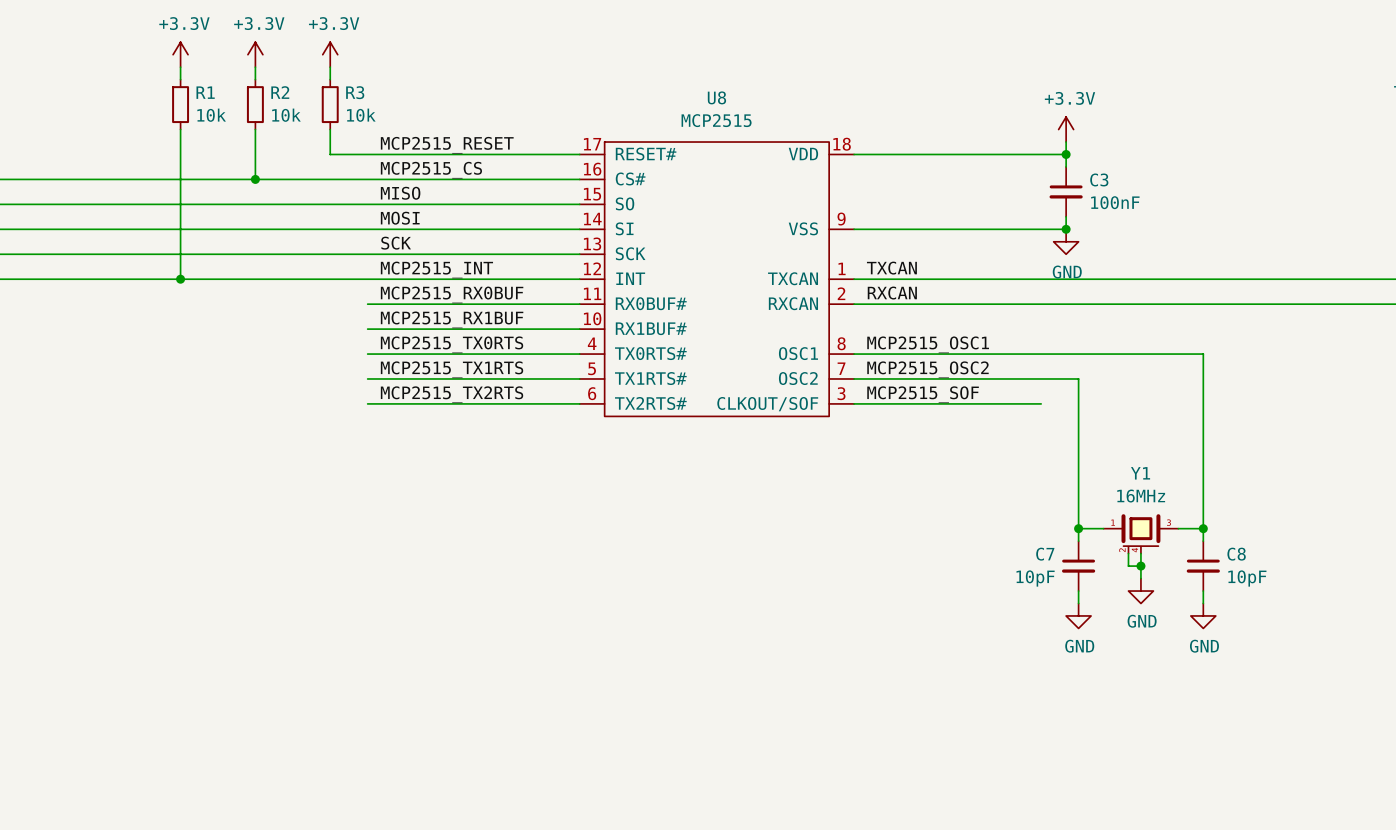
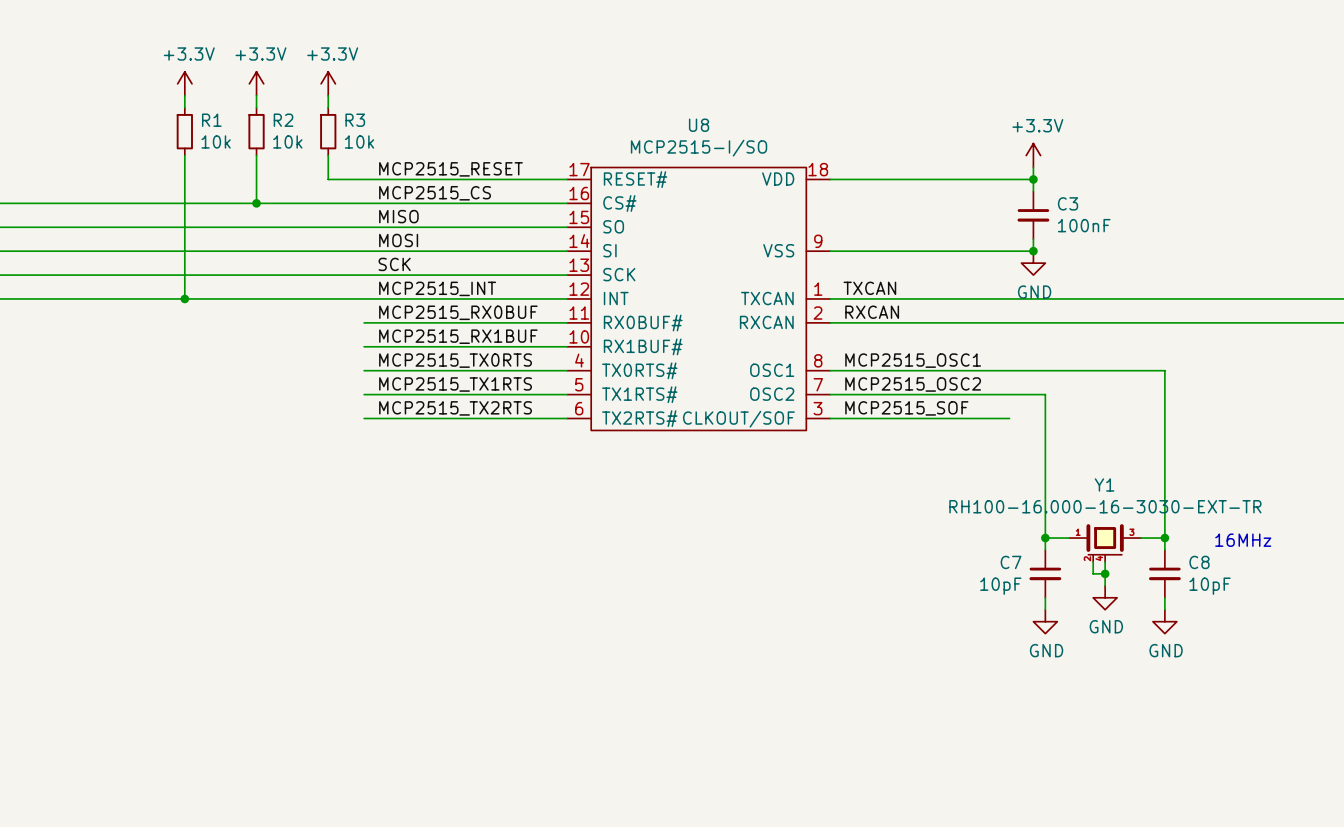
U8 value: MCP2515 (716, 120) -> MCP2515-I/SO (699, 148)
Y1 value: 16MHz (1141, 496) -> RH100-16.000-16-3030-EXT-TR (1105, 506)
text: none -> 16MHz (1243, 540)

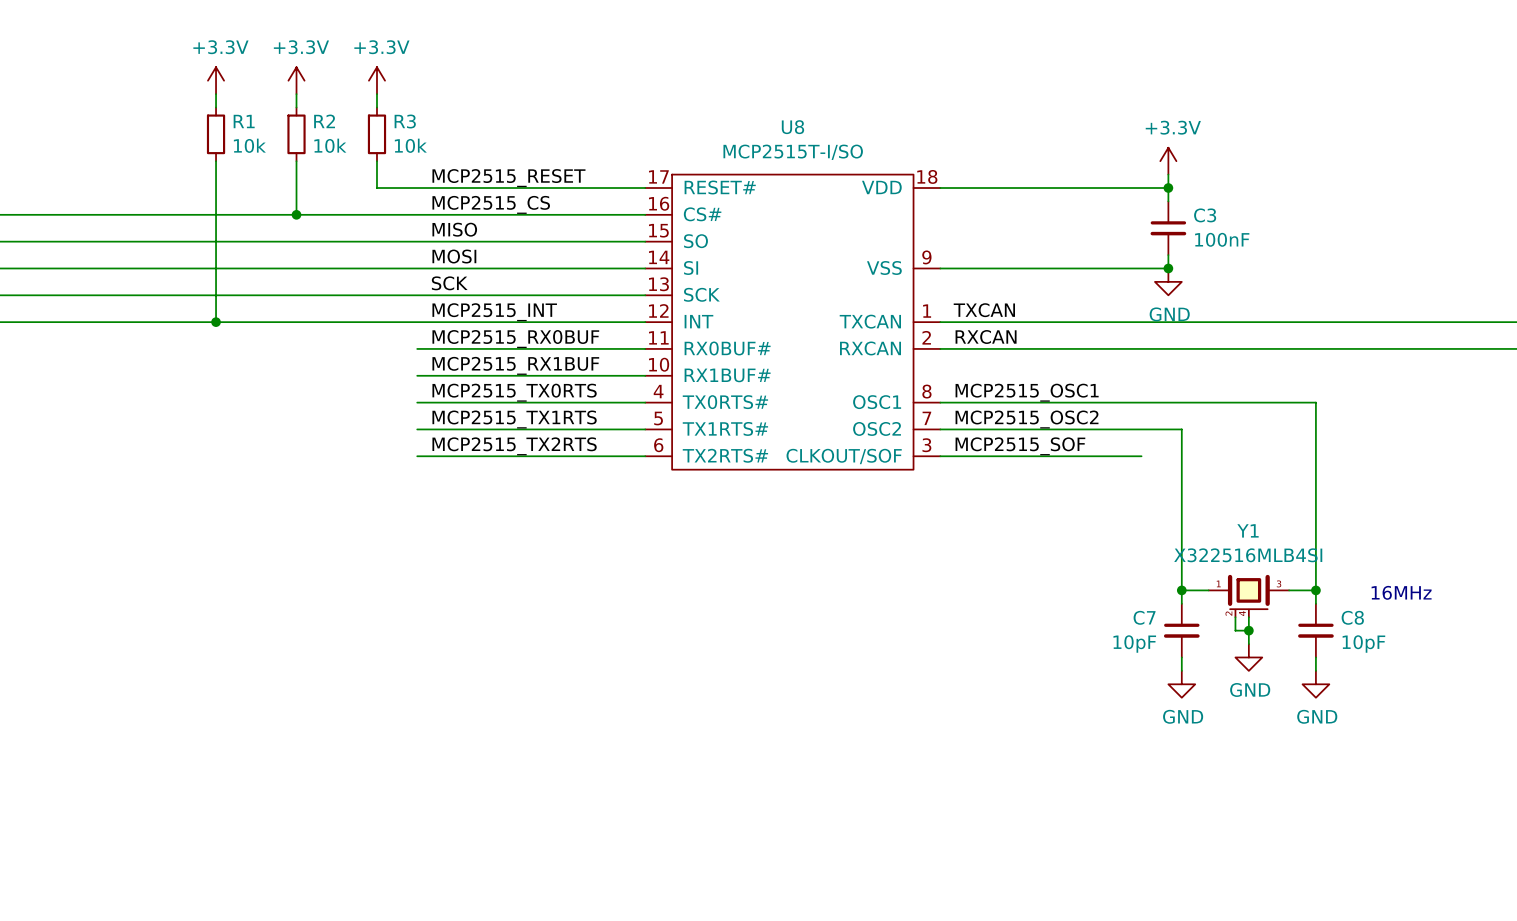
U8 value: MCP2515-I/SO (699, 148) -> MCP2515T-I/SO (793, 152)
Y1 value: RH100-16.000-16-3030-EXT-TR (1105, 506) -> X322516MLB4SI (1248, 555)

